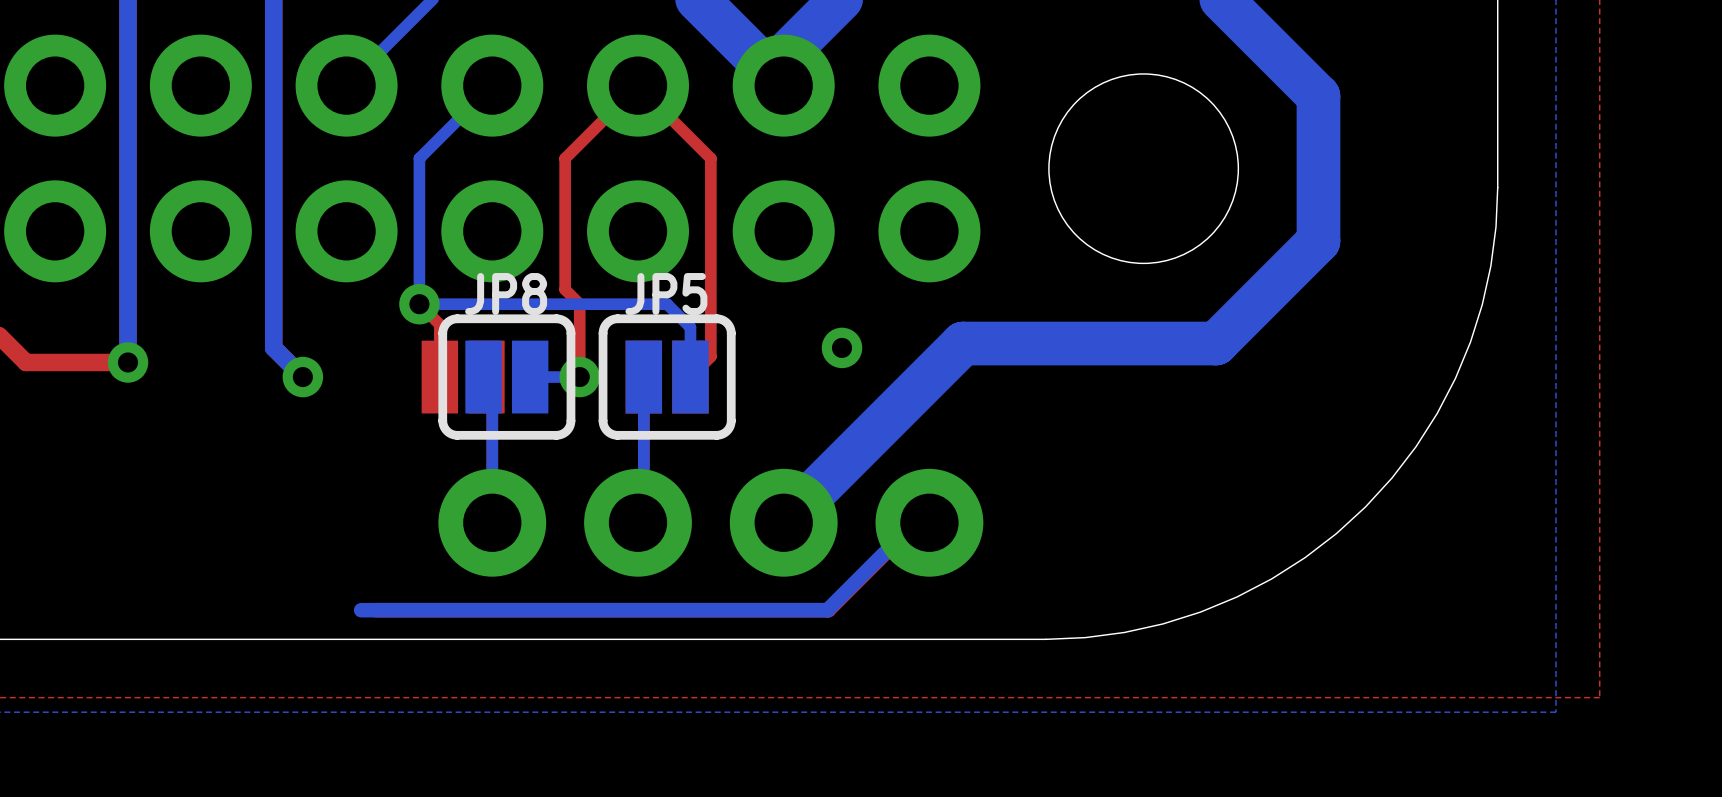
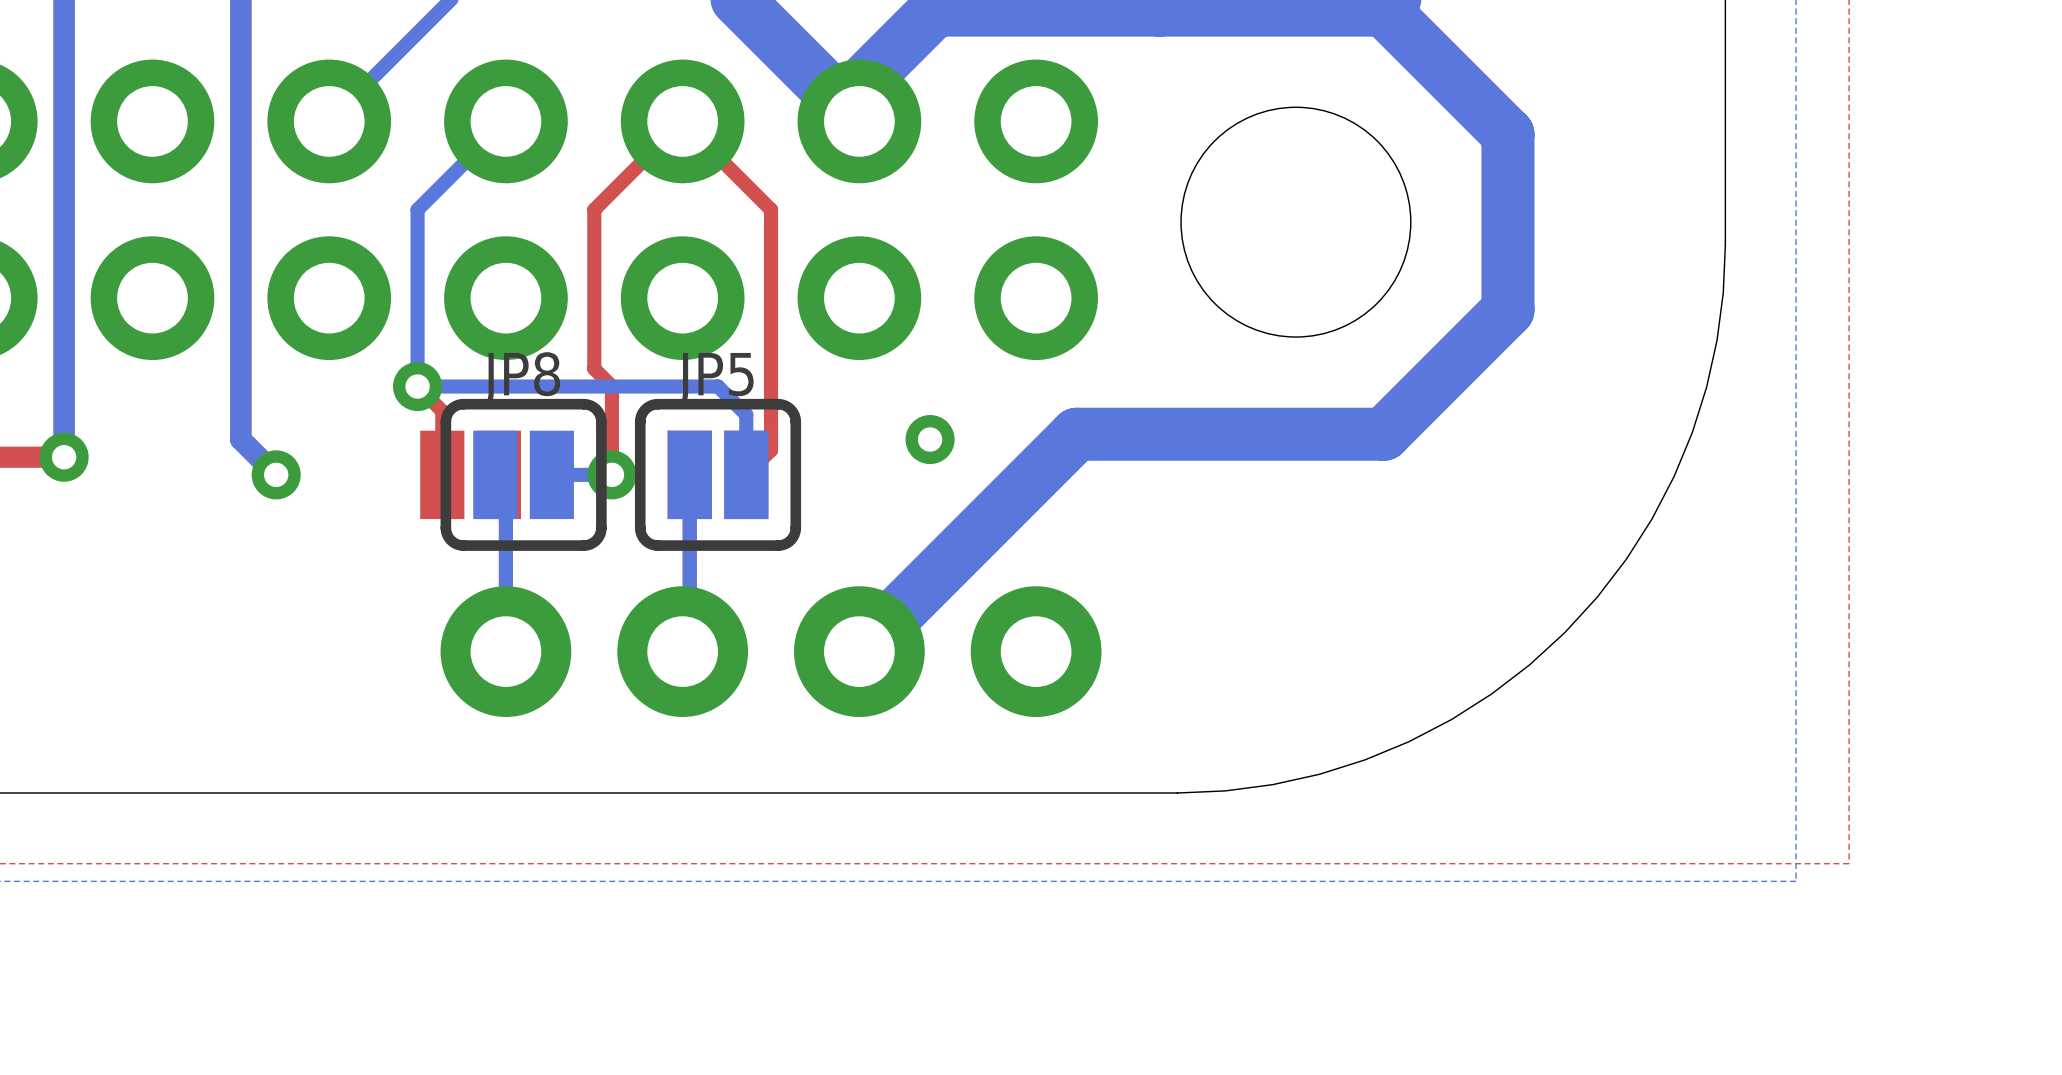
bottom track: (929, 522) (914, 522) (827, 610) (361, 610) -> none

